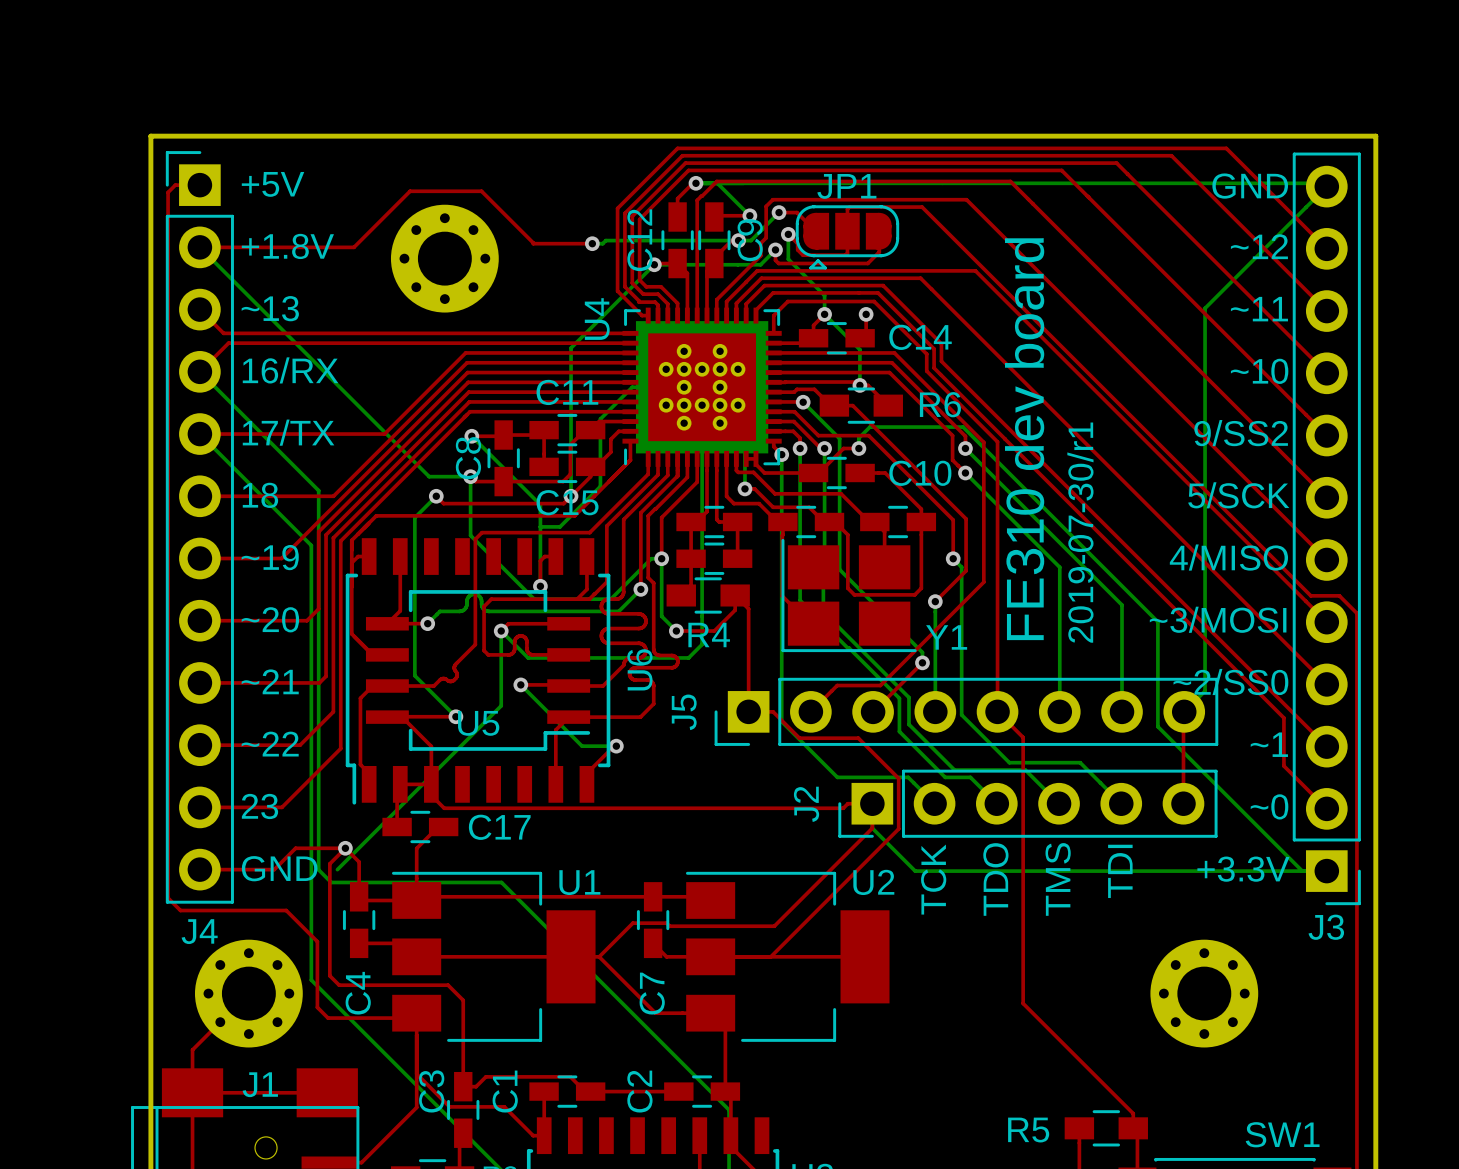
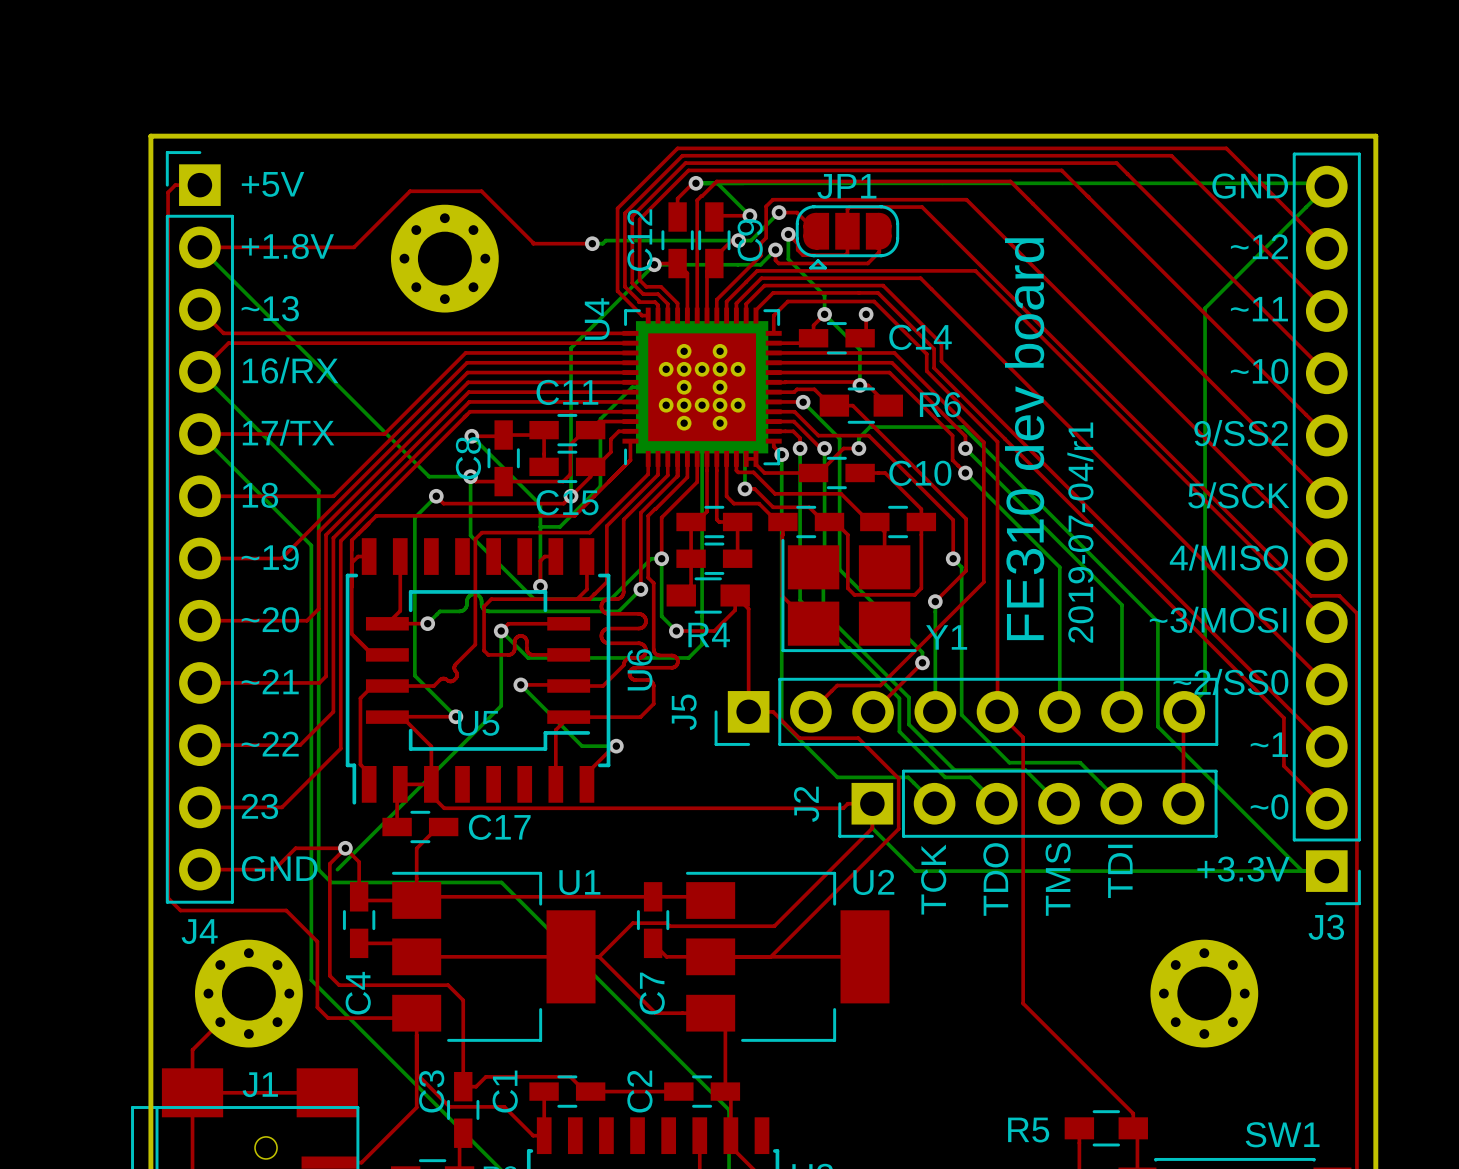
text: 2019-07-30/r1 (1080, 532) -> 2019-07-04/r1 (1080, 532)

